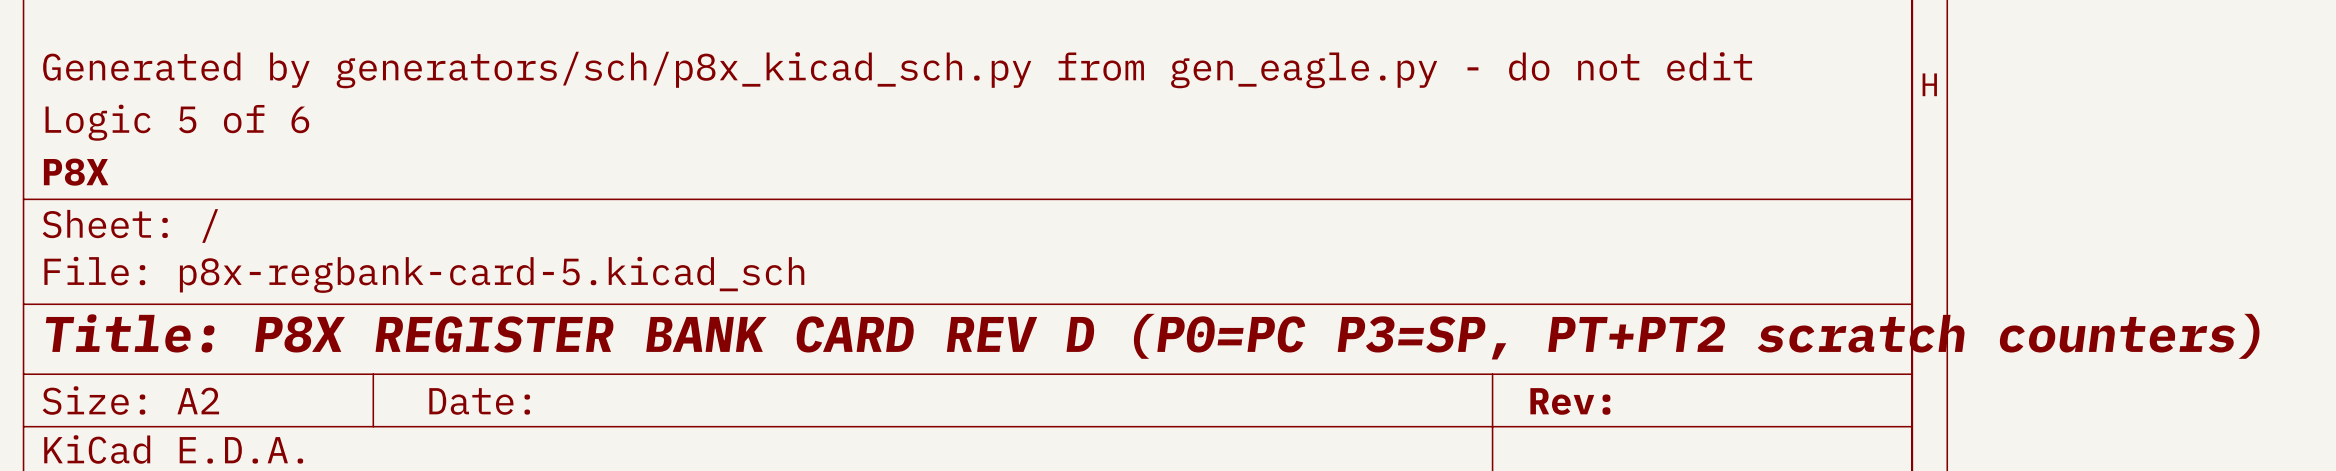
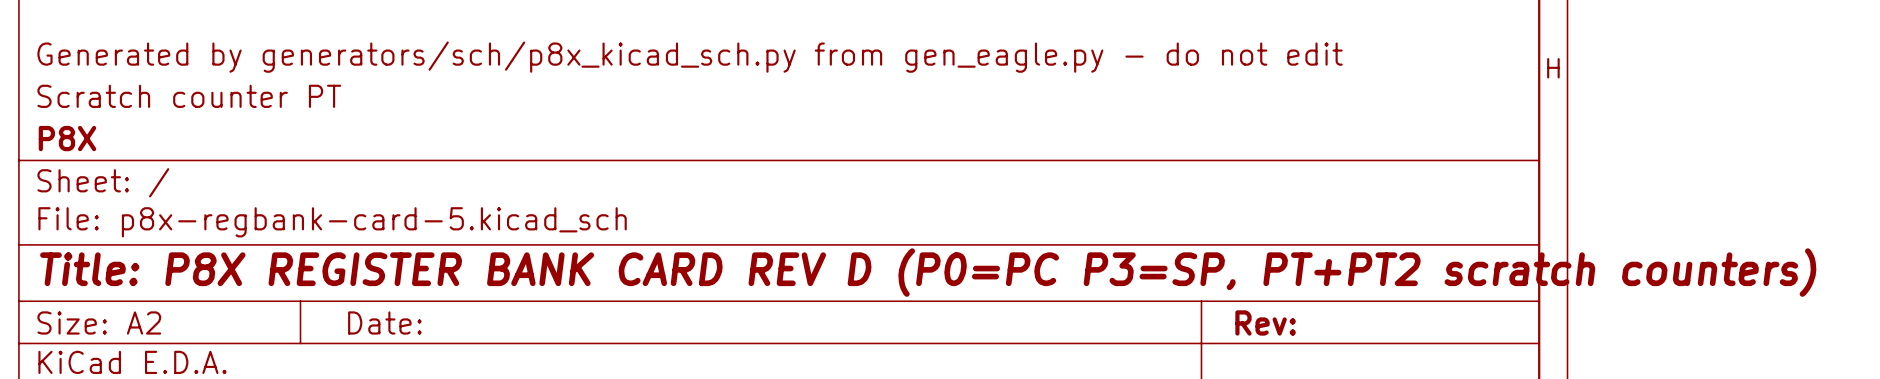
title block: Logic 5 of 6 (177, 122) -> Scratch counter PT (189, 96)

